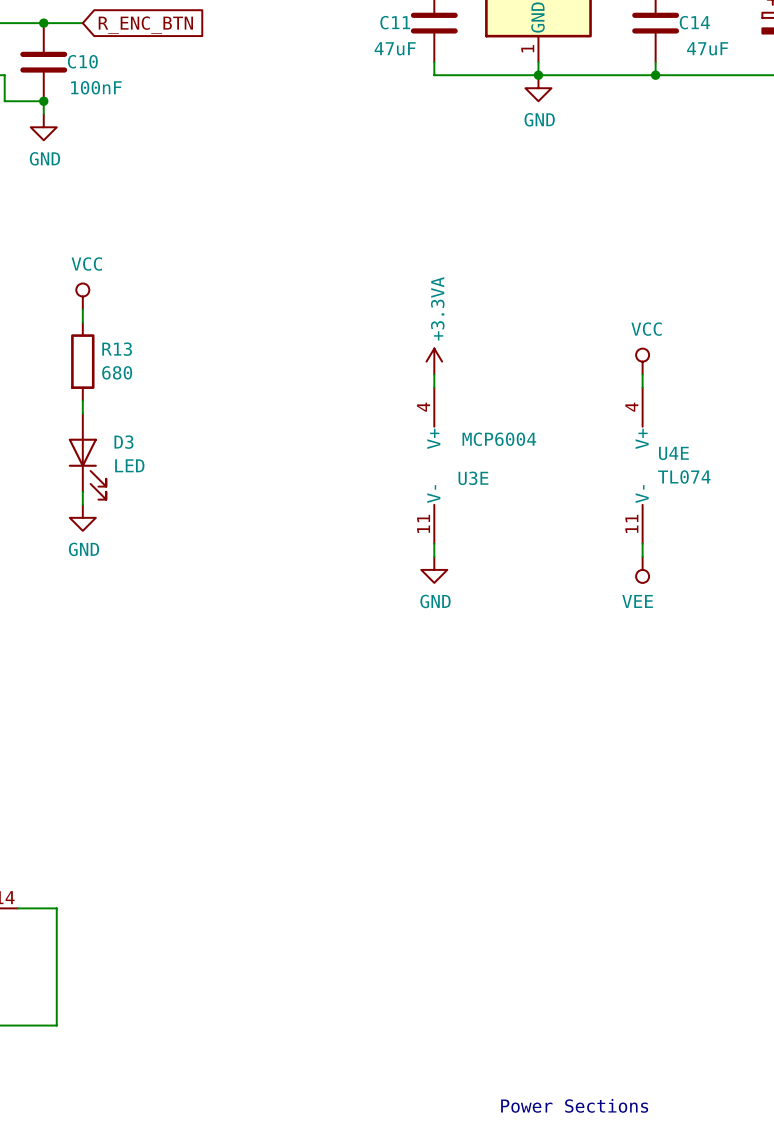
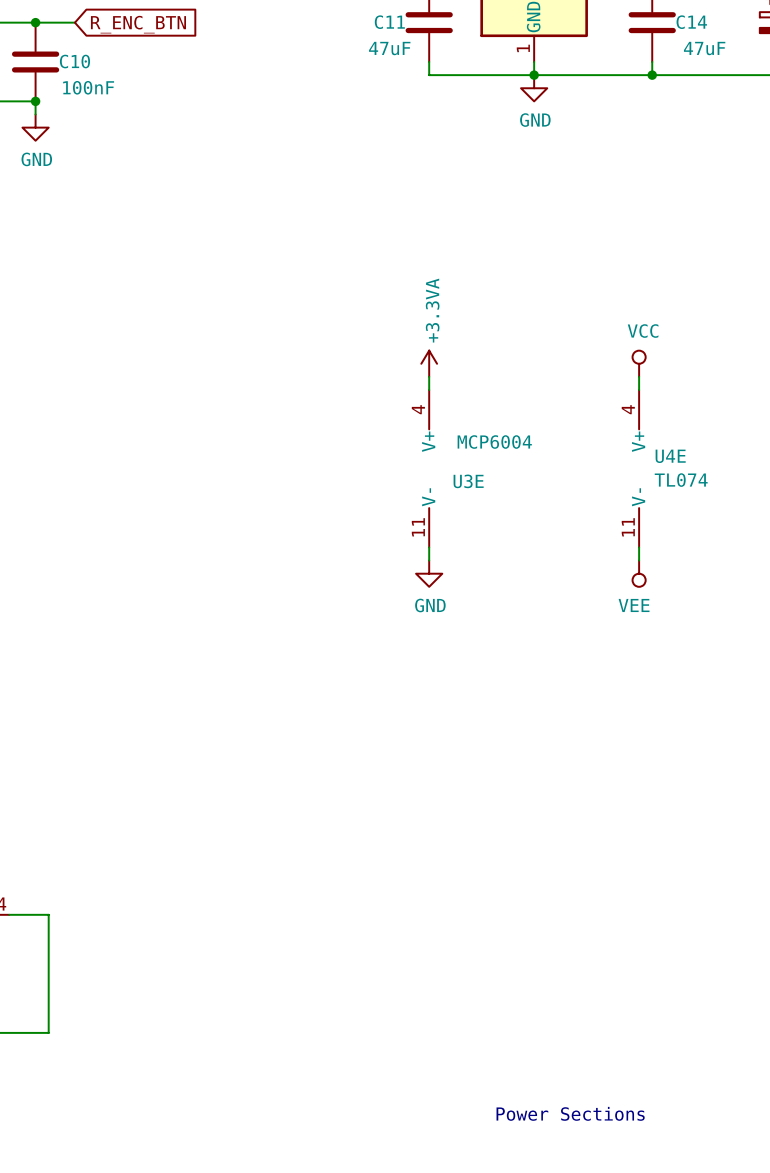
power symbol: VCC (82, 296) -> none
wire: (82, 309) (82, 322) -> none
R13: 680 (82, 361) -> none
wire: (82, 400) (82, 413) -> none
D3: LED (87, 456) -> none
wire: (82, 491) (82, 504) -> none
power symbol: GND (82, 517) -> none

